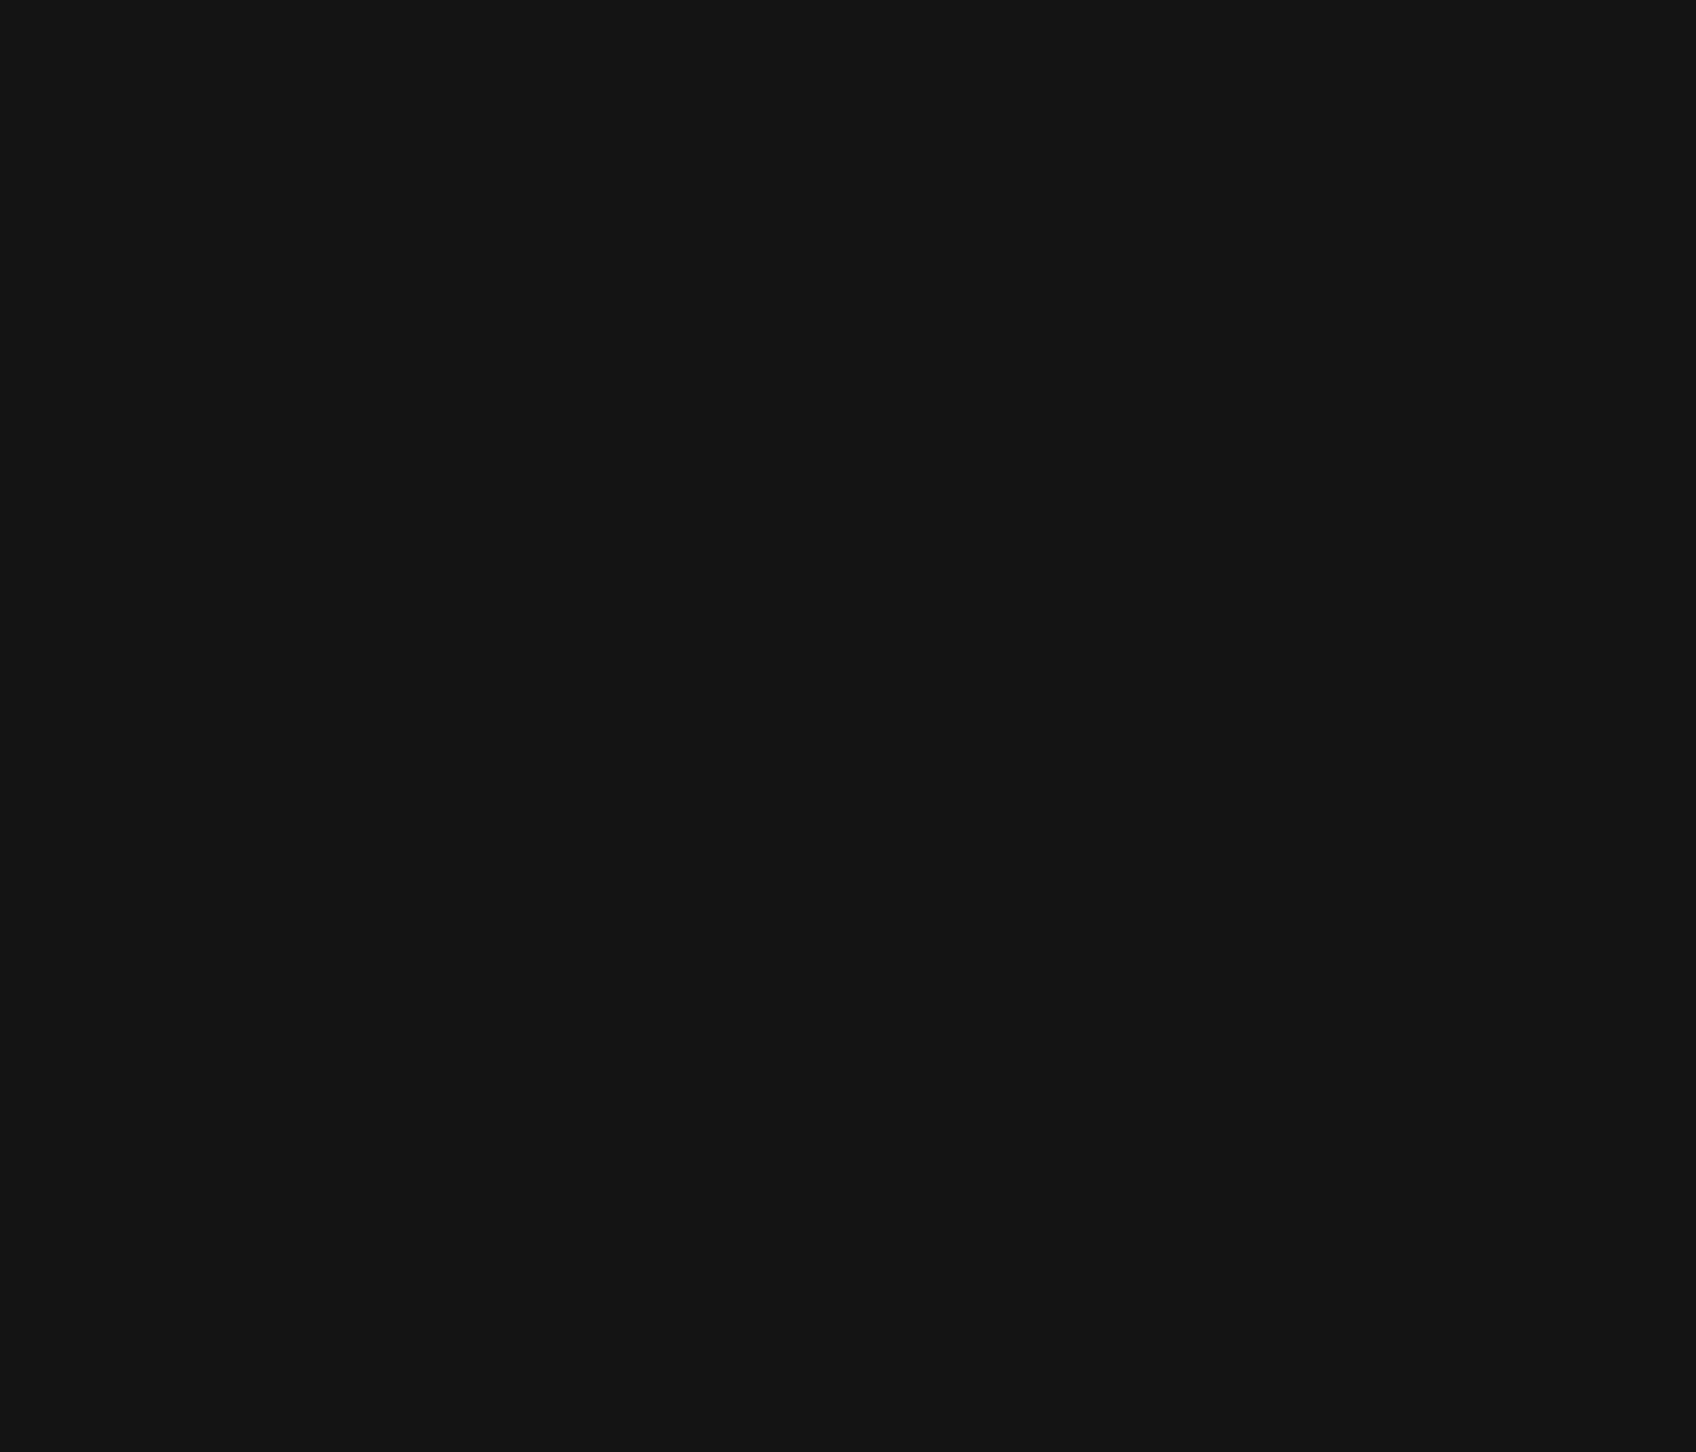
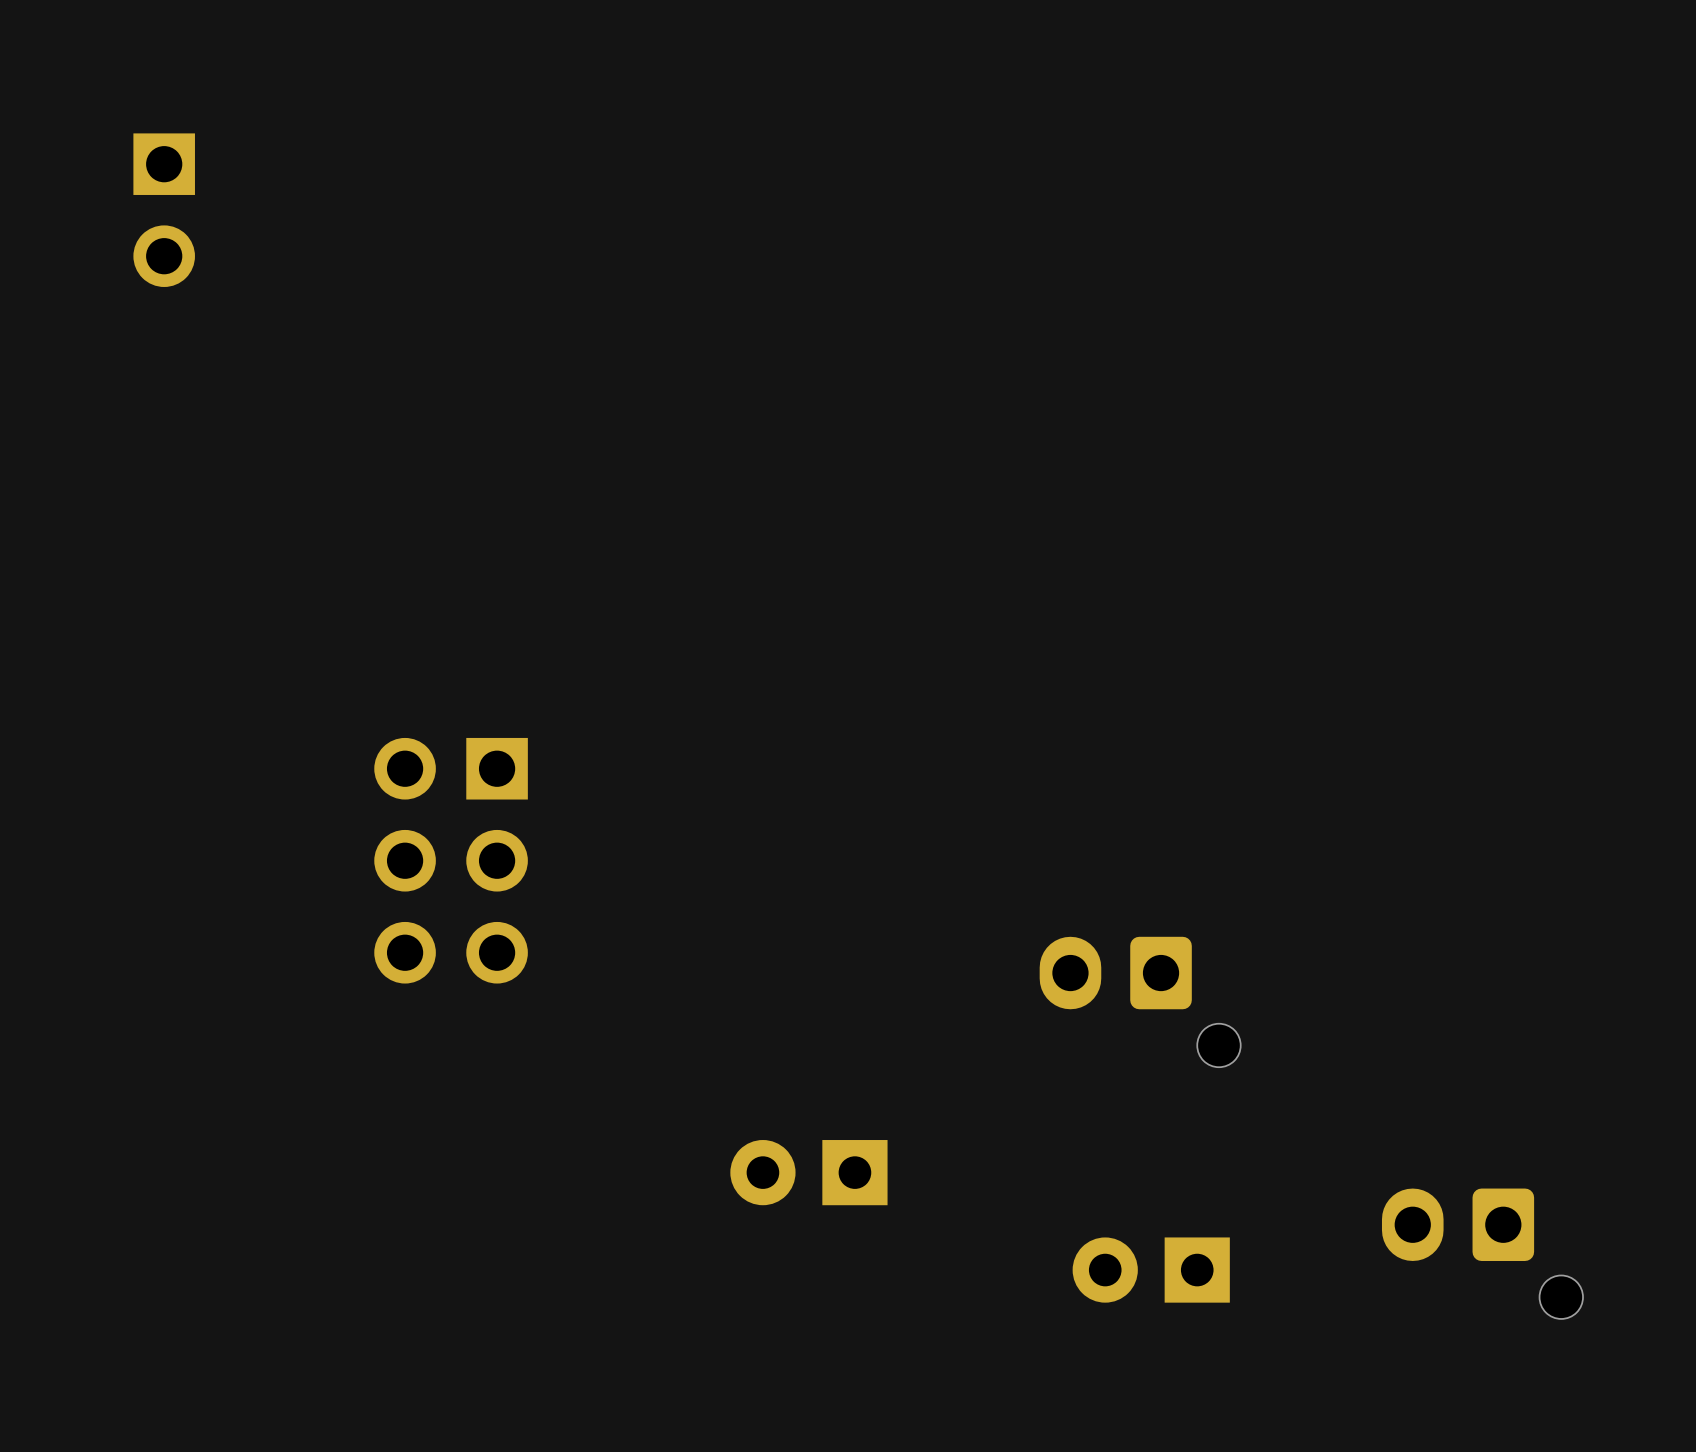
part: none -> (164, 210)
part: none -> (451, 860)
part: none -> (1140, 1002)
part: none -> (808, 1172)
part: none -> (1482, 1253)
part: none -> (1151, 1270)

